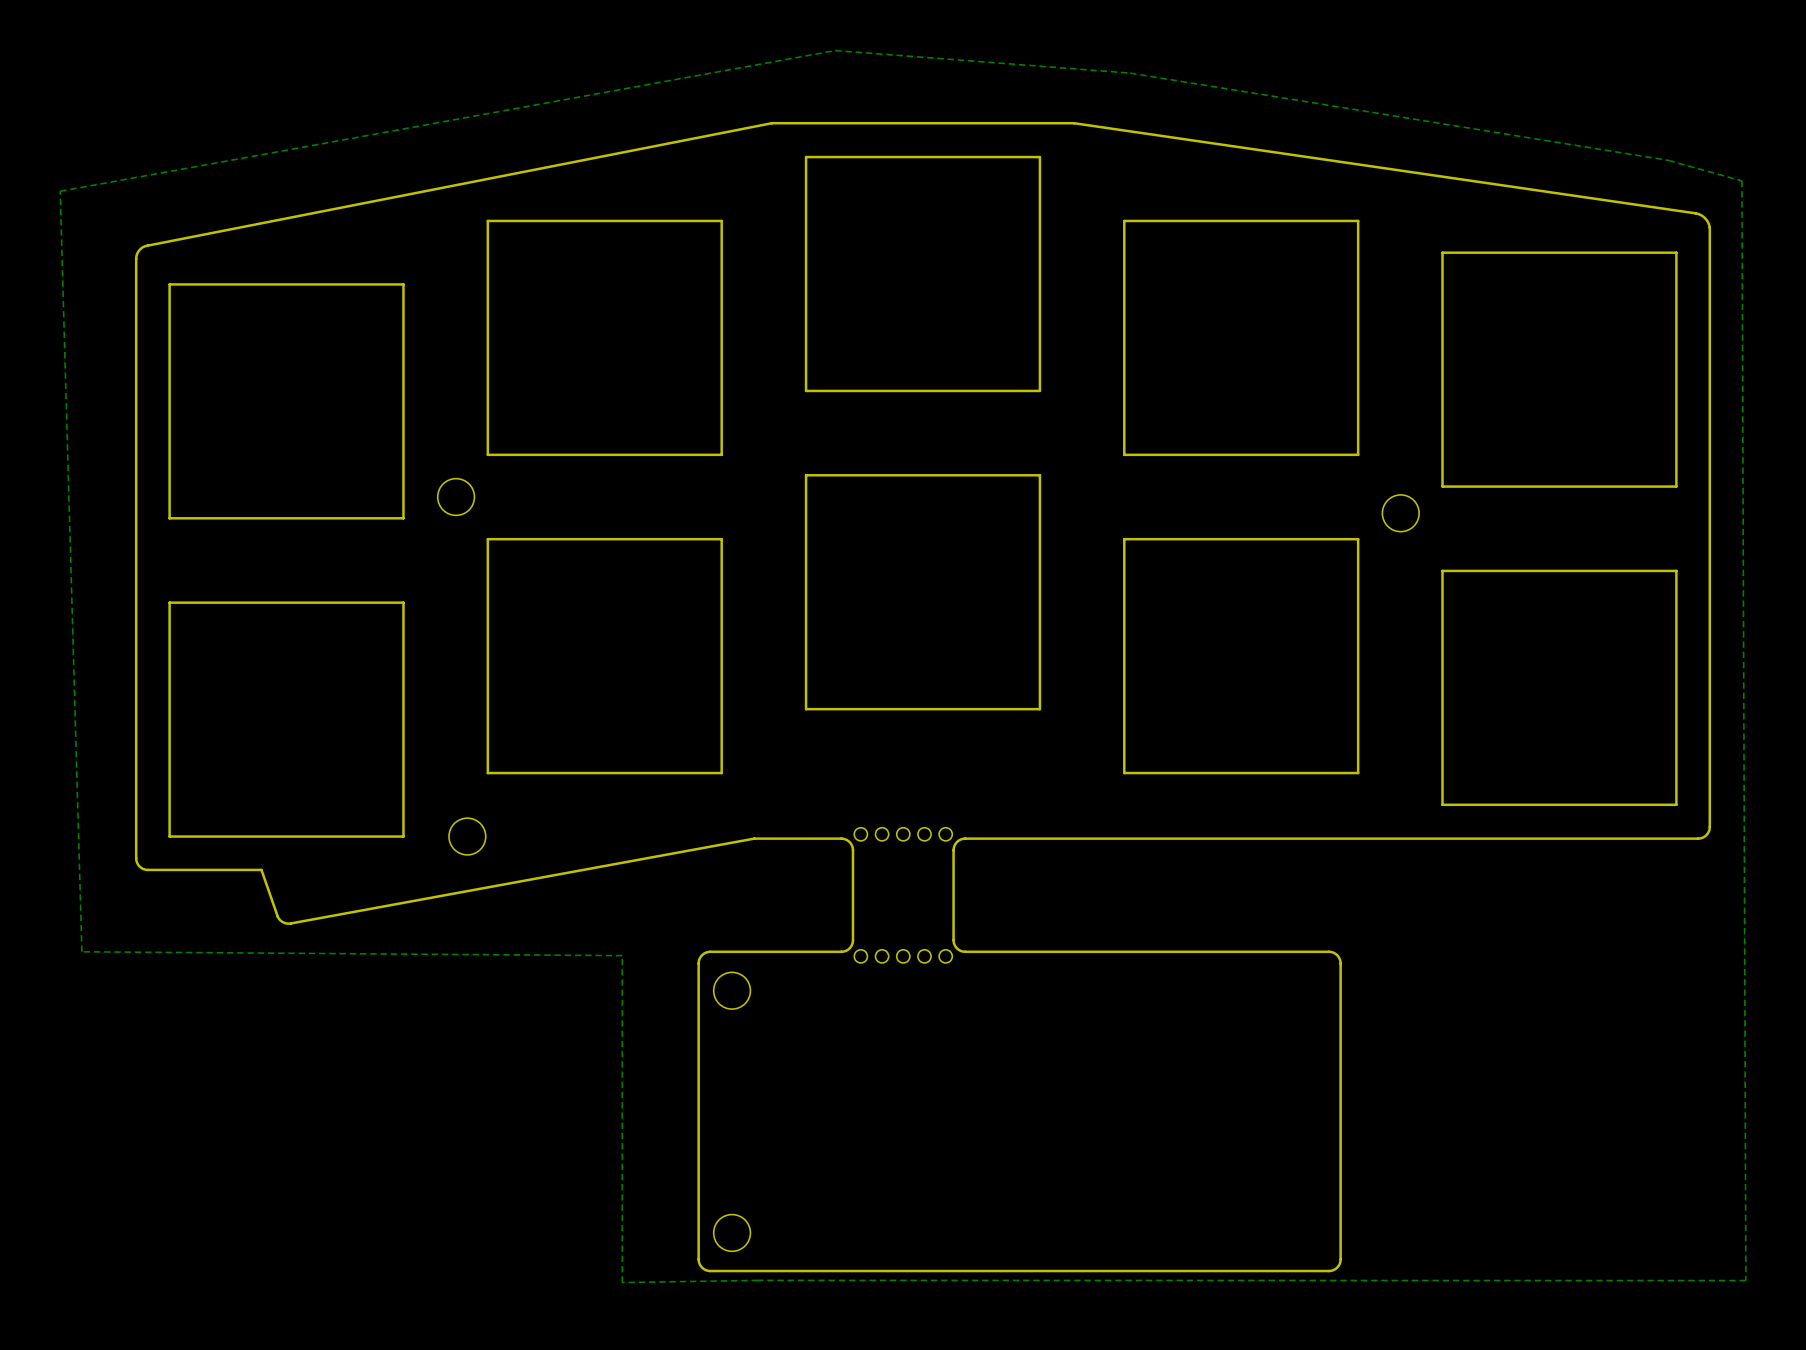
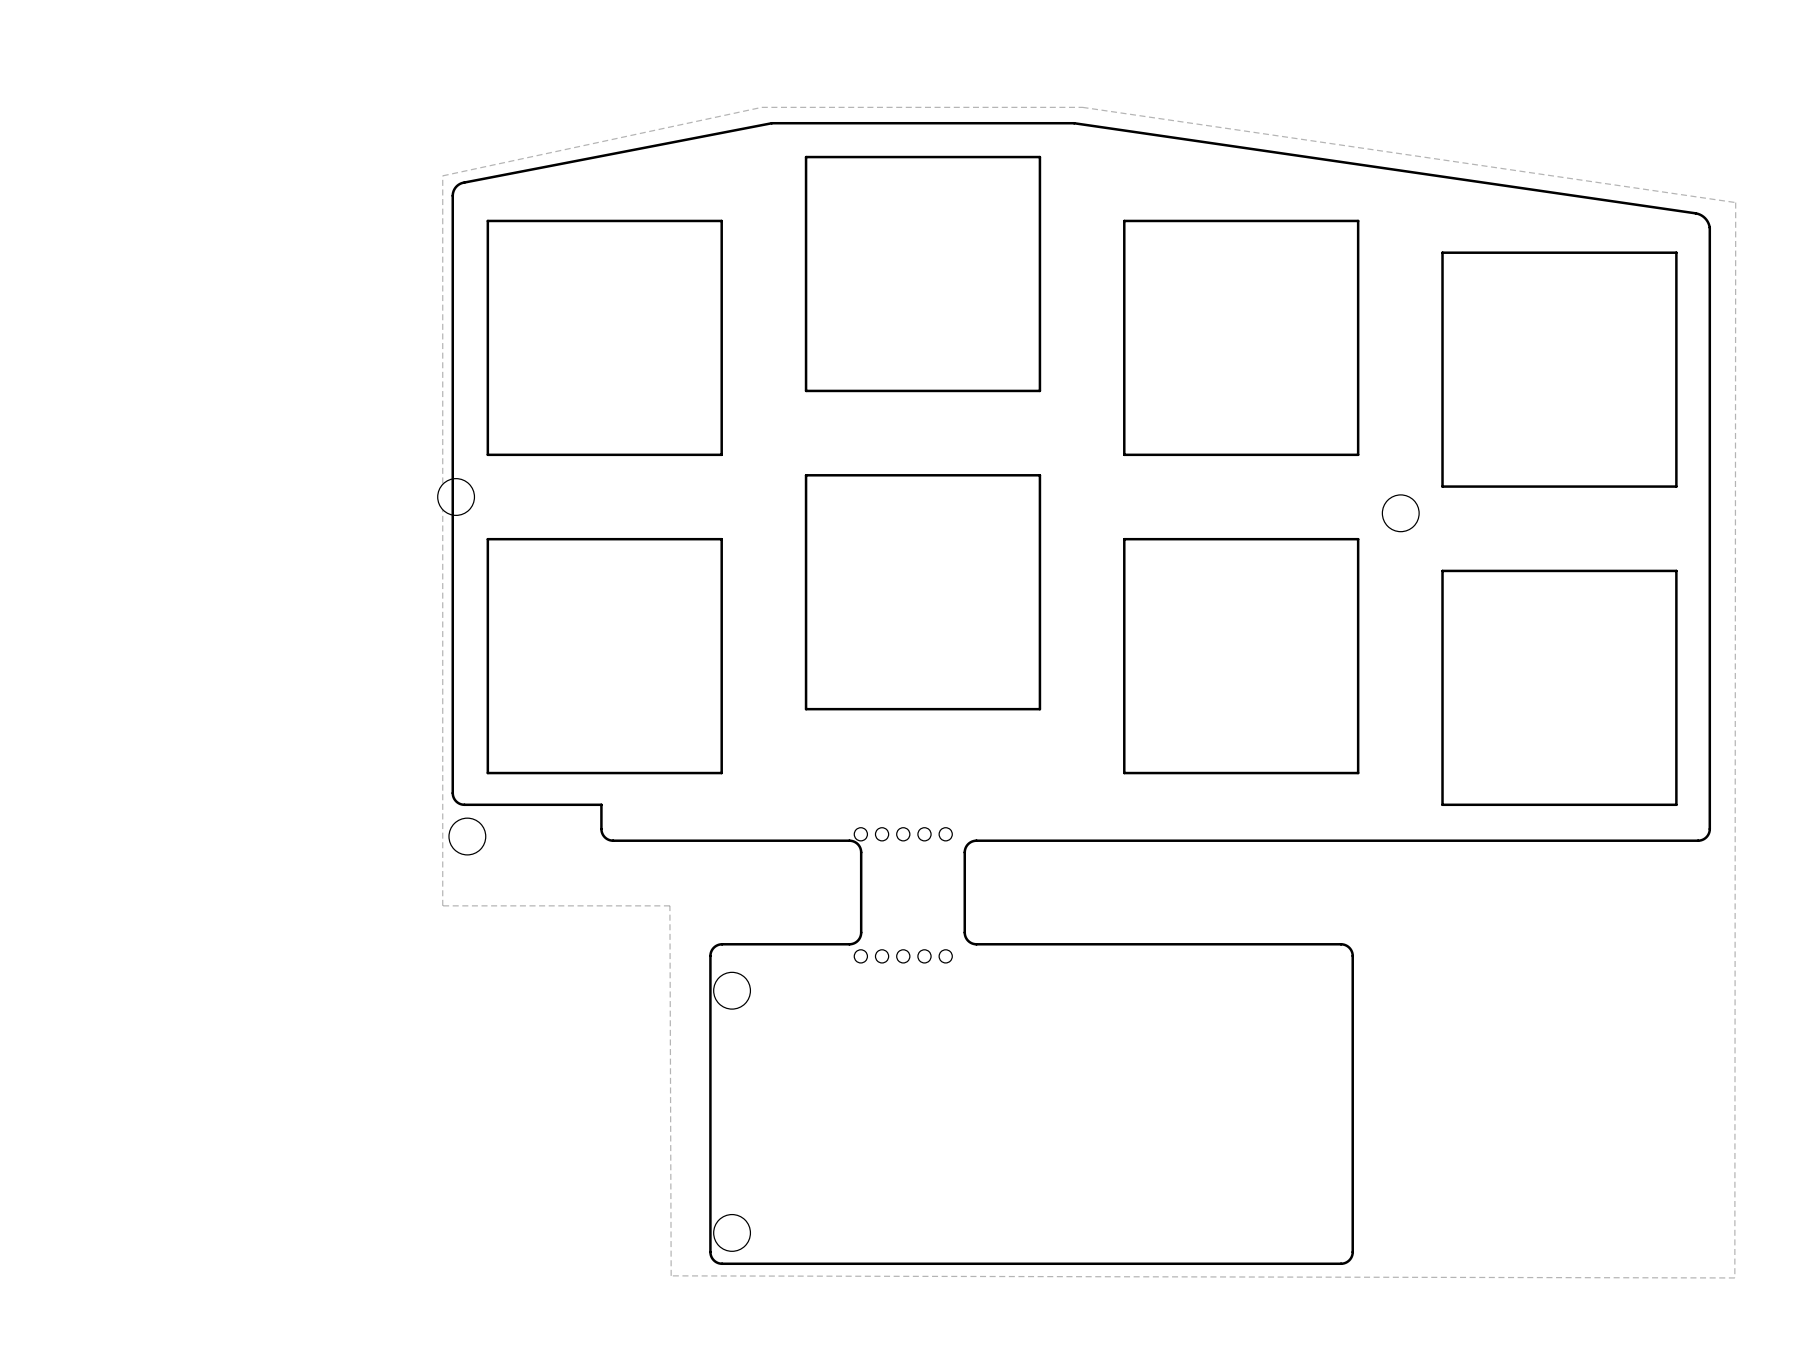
zone outline: (835, 50) (60, 191) (81, 951) (622, 955) (622, 1282) (757, 1280) (1745, 1280) (1741, 180) (1668, 160) (1130, 73) (835, 50) -> (1082, 107) (1735, 202) (1734, 1277) (671, 1275) (669, 905) (442, 905) (442, 175) (761, 107) (1082, 107)
board edge: (771, 123) (146, 245) (139, 250) (136, 258) (136, 861) (139, 866) (146, 869) (261, 869) (277, 916) (282, 921) (288, 923) (754, 838) (845, 839) (850, 843) (853, 850) (853, 940) (848, 949) (841, 951) (708, 951) (703, 954) (699, 960) (698, 1259) (703, 1268) (710, 1271) (1328, 1271) (1336, 1268) (1340, 1259) (1340, 963) (1338, 956) (1328, 951) (962, 951) (955, 947) (953, 941) (953, 850) (956, 842) (965, 838) -> (771, 123) (462, 182) (456, 186) (452, 195) (452, 793) (454, 798) (458, 803) (464, 804) (601, 804) (601, 832) (605, 838) (611, 840) (849, 840) (856, 843) (860, 849) (861, 932) (856, 941) (849, 944) (720, 944) (714, 946) (711, 951) (710, 1252)
board edge: (403, 284) (403, 518) (169, 518) (169, 284) (403, 284) -> none
board edge: (403, 602) (403, 836) (169, 836) (169, 602) (403, 602) -> none
board edge: (1709, 826) (1706, 835) (1698, 838) (965, 838) -> (1709, 826) (1707, 836) (1698, 840) (971, 841) (967, 845) (964, 850) (964, 932) (967, 939) (973, 943) (1341, 944) (1349, 947) (1352, 955) (1352, 1252) (1351, 1257) (1346, 1262) (1341, 1263) (722, 1263) (713, 1260) (710, 1252)

